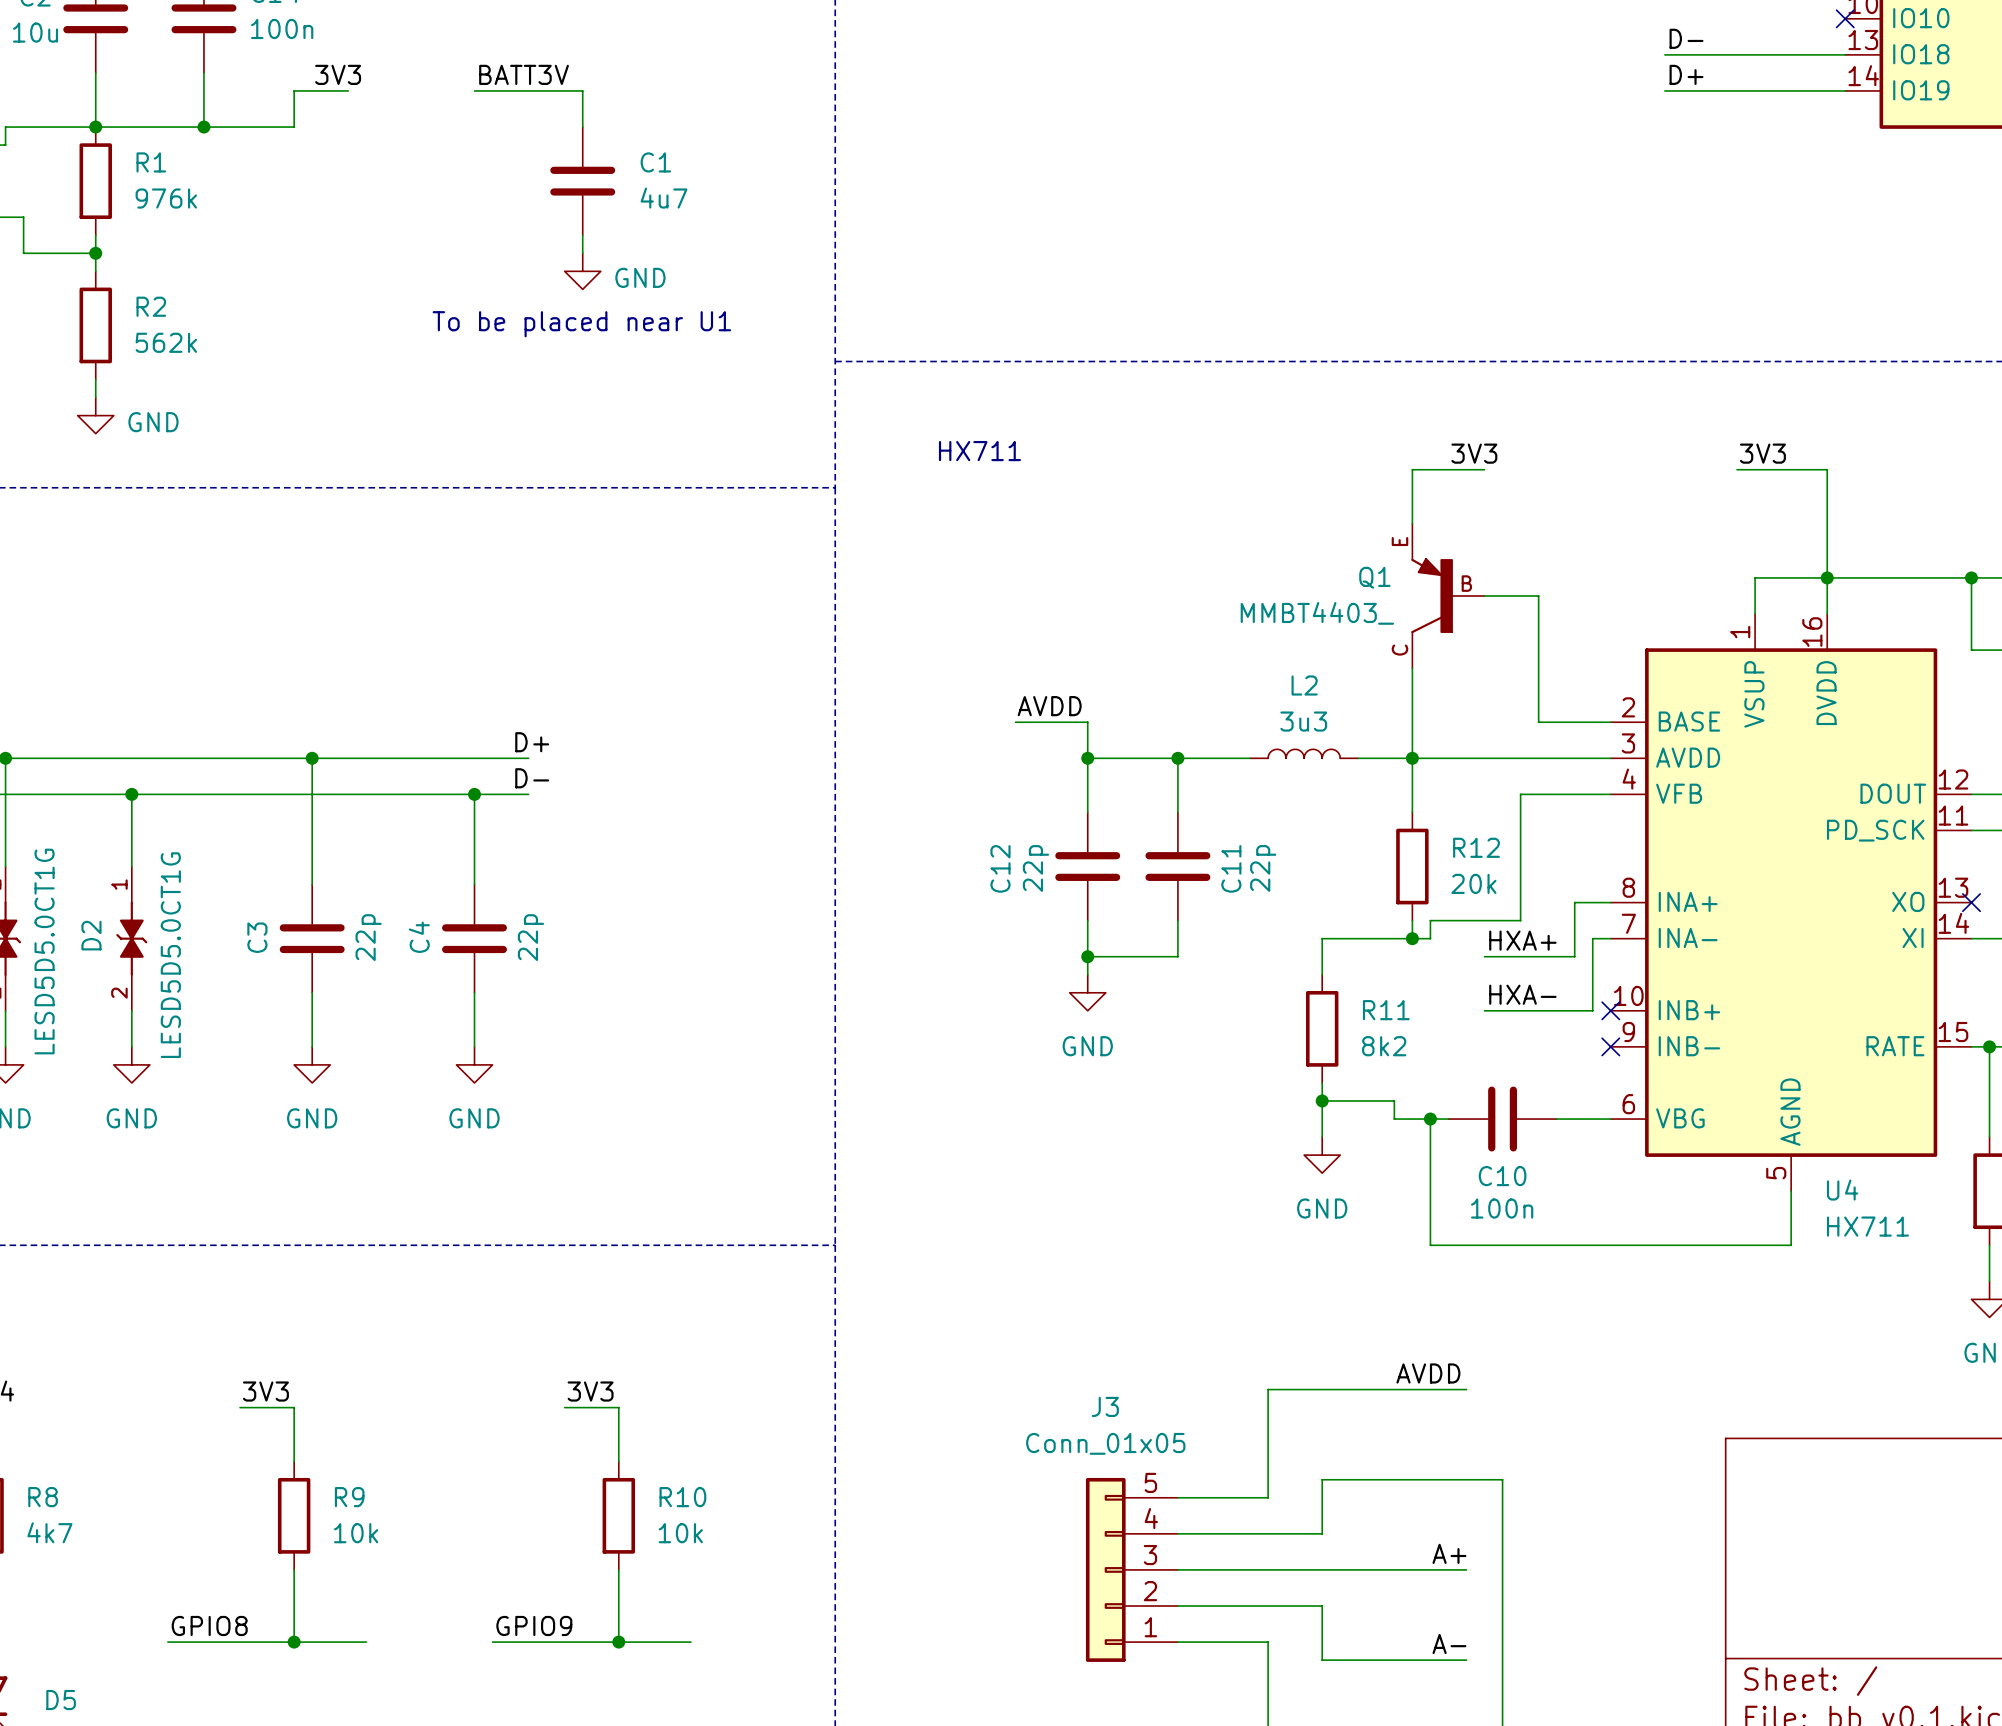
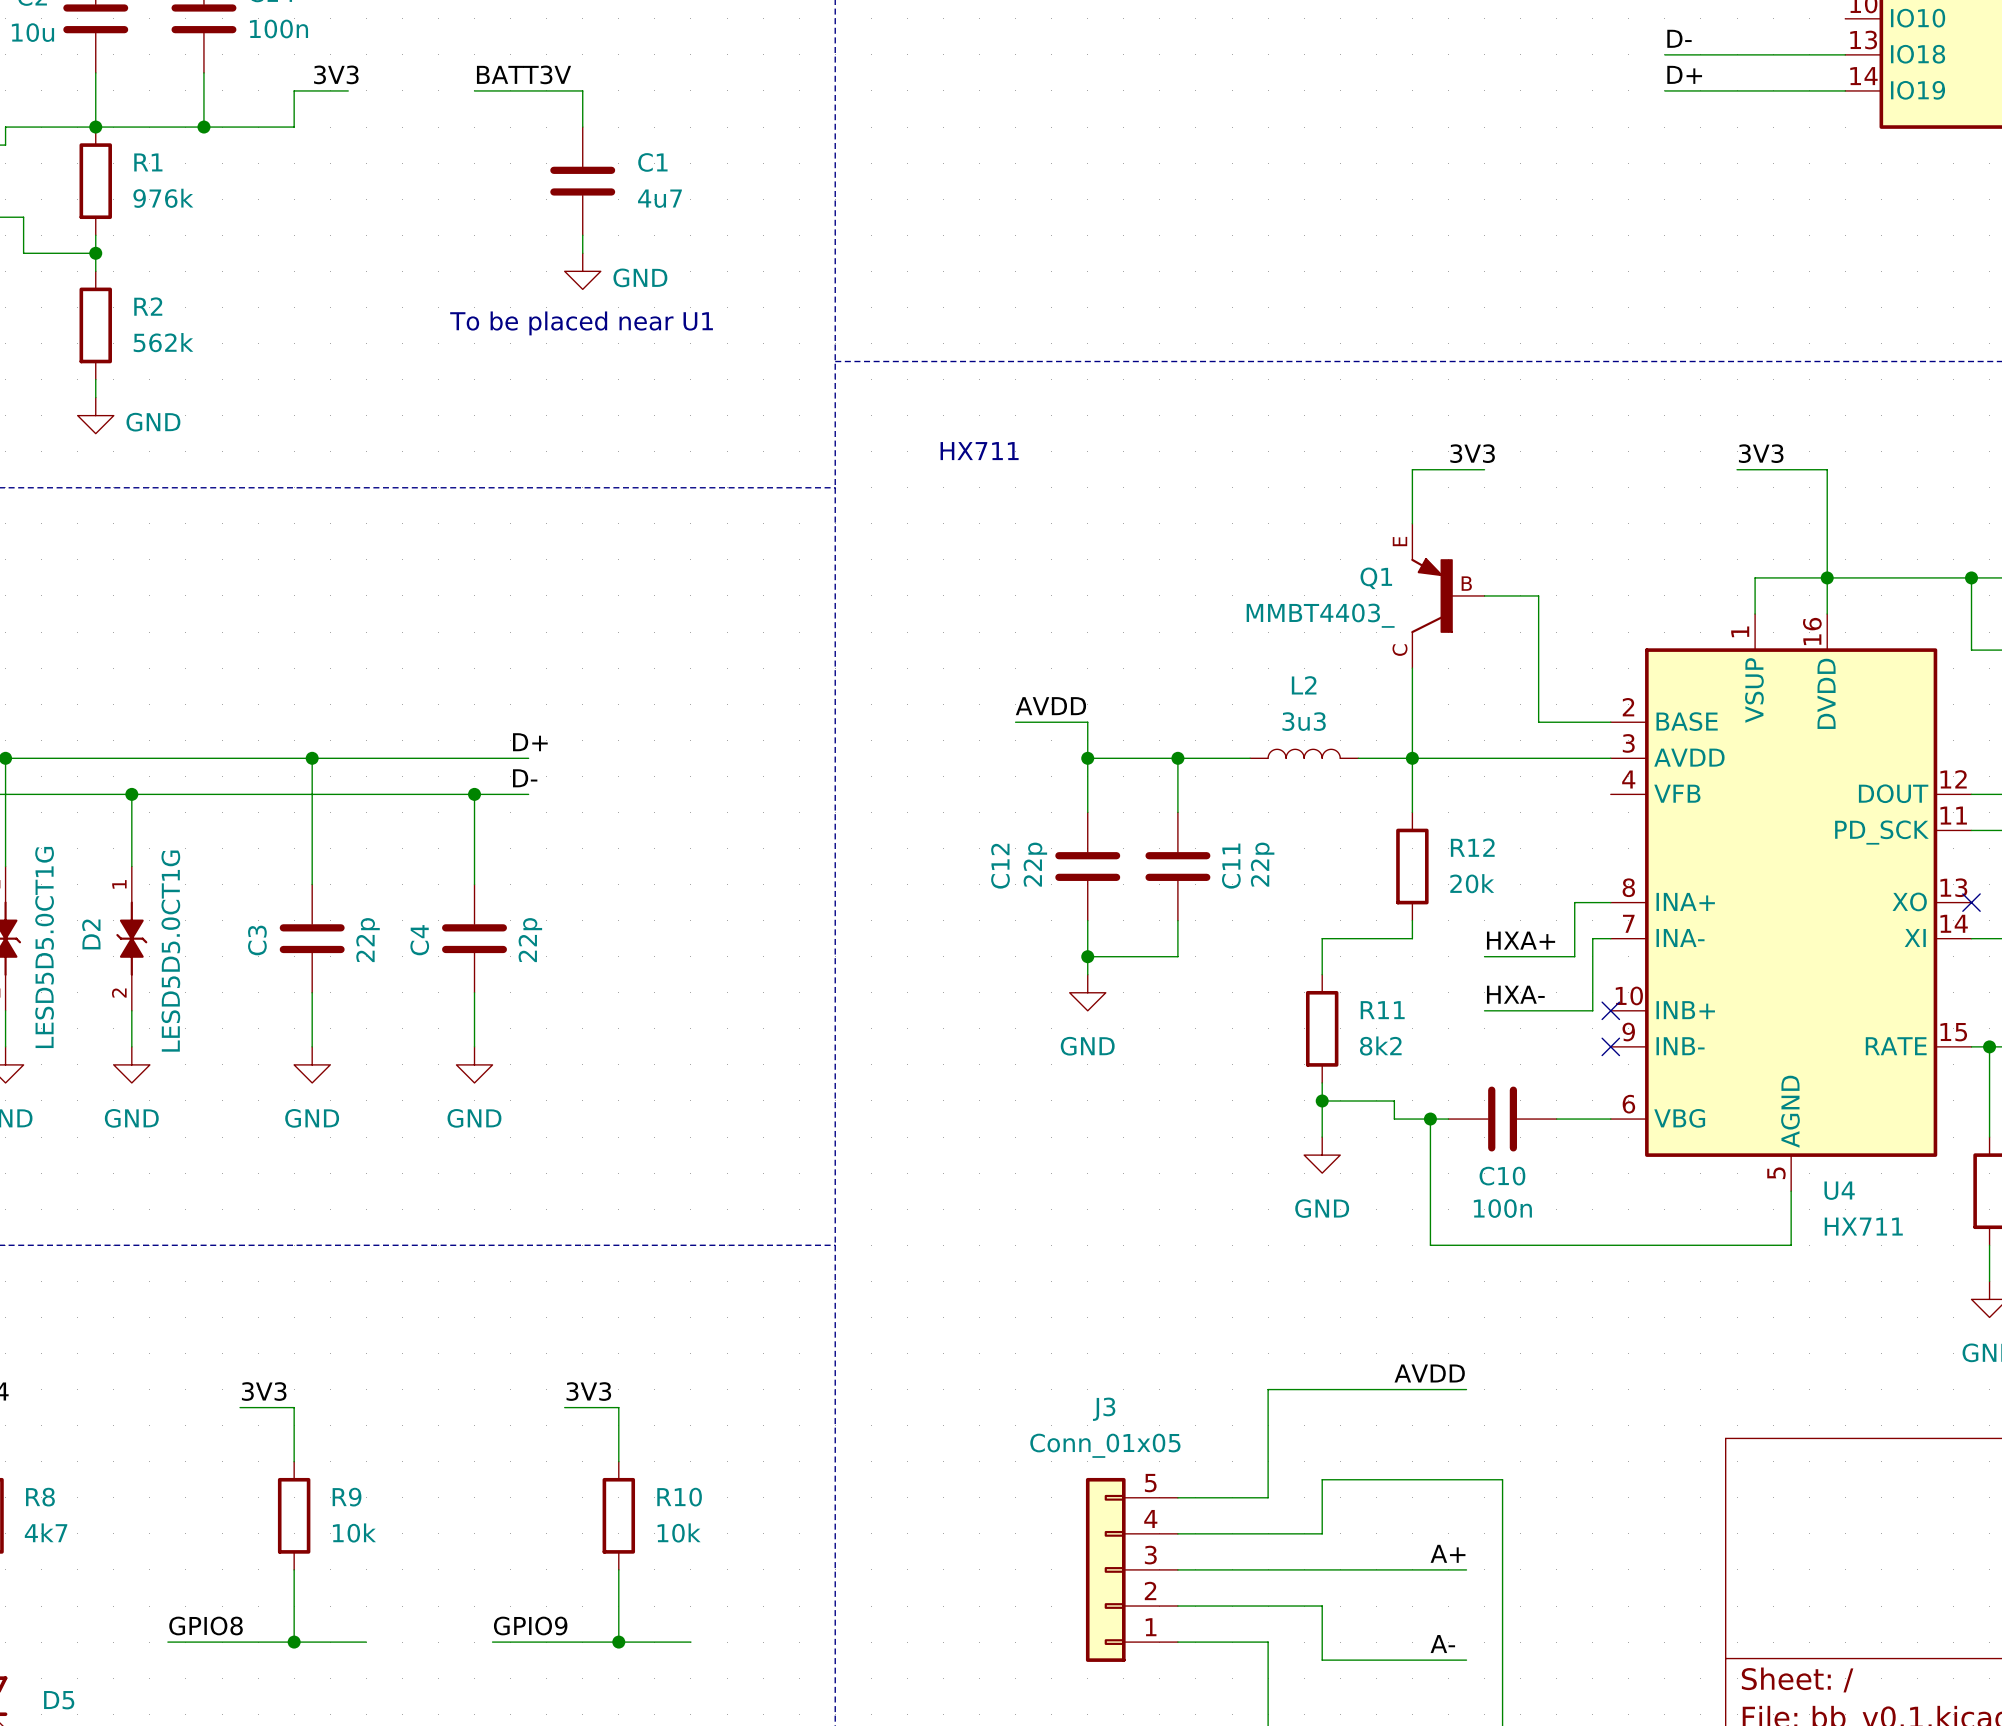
no-connect mark: (1845, 18) -> none
wire: (1610, 794) (1520, 794) (1520, 920) (1430, 920) (1430, 938) (1412, 938) -> none
junction: (1412, 938) -> none

